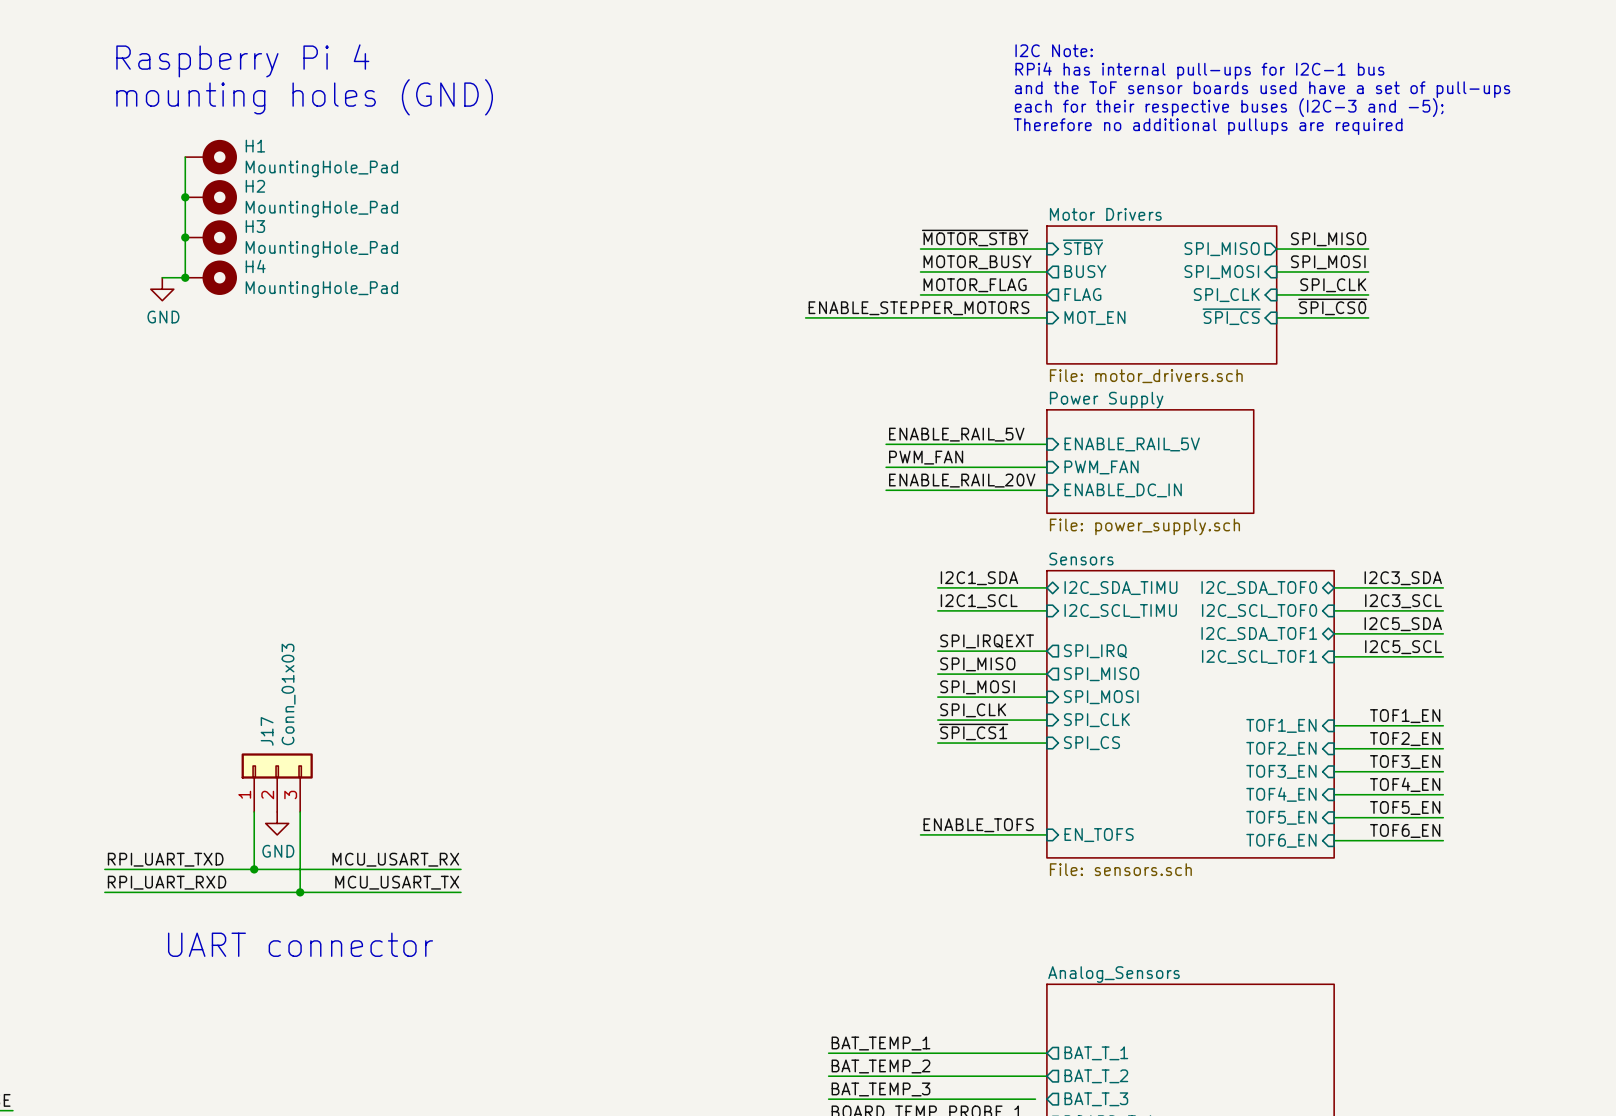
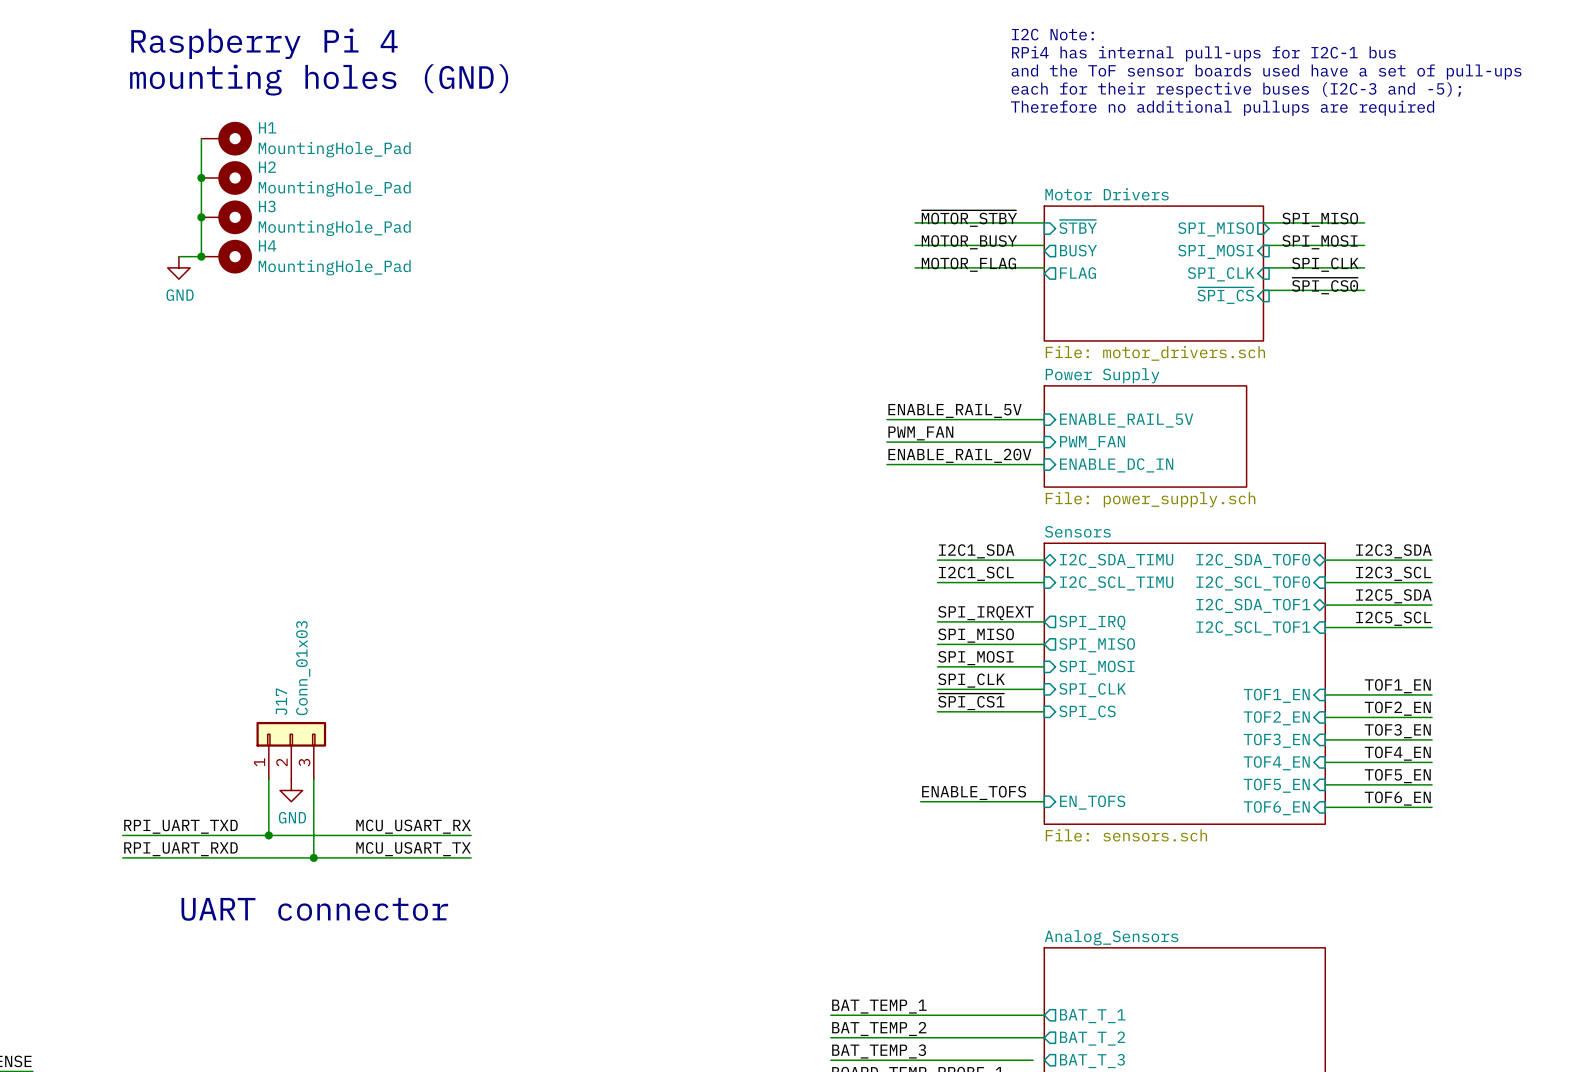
sheet Motor Drivers shape: [1046, 226, 1277, 364] -> [1044, 206, 1264, 341]
wire: none -> (915, 222) (1044, 222)
wire: none -> (1263, 222) (1364, 222)
wire: (920, 249) (1046, 249) -> none
wire: (1276, 249) (1368, 249) -> none
wire: none -> (915, 245) (1044, 245)
wire: none -> (1263, 245) (1364, 245)
wire: (920, 271) (1046, 271) -> none
wire: (1276, 271) (1368, 271) -> none
wire: none -> (915, 267) (1044, 267)
wire: none -> (1263, 267) (1364, 267)
wire: (920, 294) (1046, 294) -> none
wire: (1276, 294) (1368, 294) -> none
label: ENABLE_STEPPER_MOTORS (918, 308) -> none
wire: none -> (1263, 290) (1364, 290)
wire: (805, 317) (1046, 317) -> none
wire: (1276, 317) (1368, 317) -> none
sheet pin: MOT_EN (1094, 318) -> none

